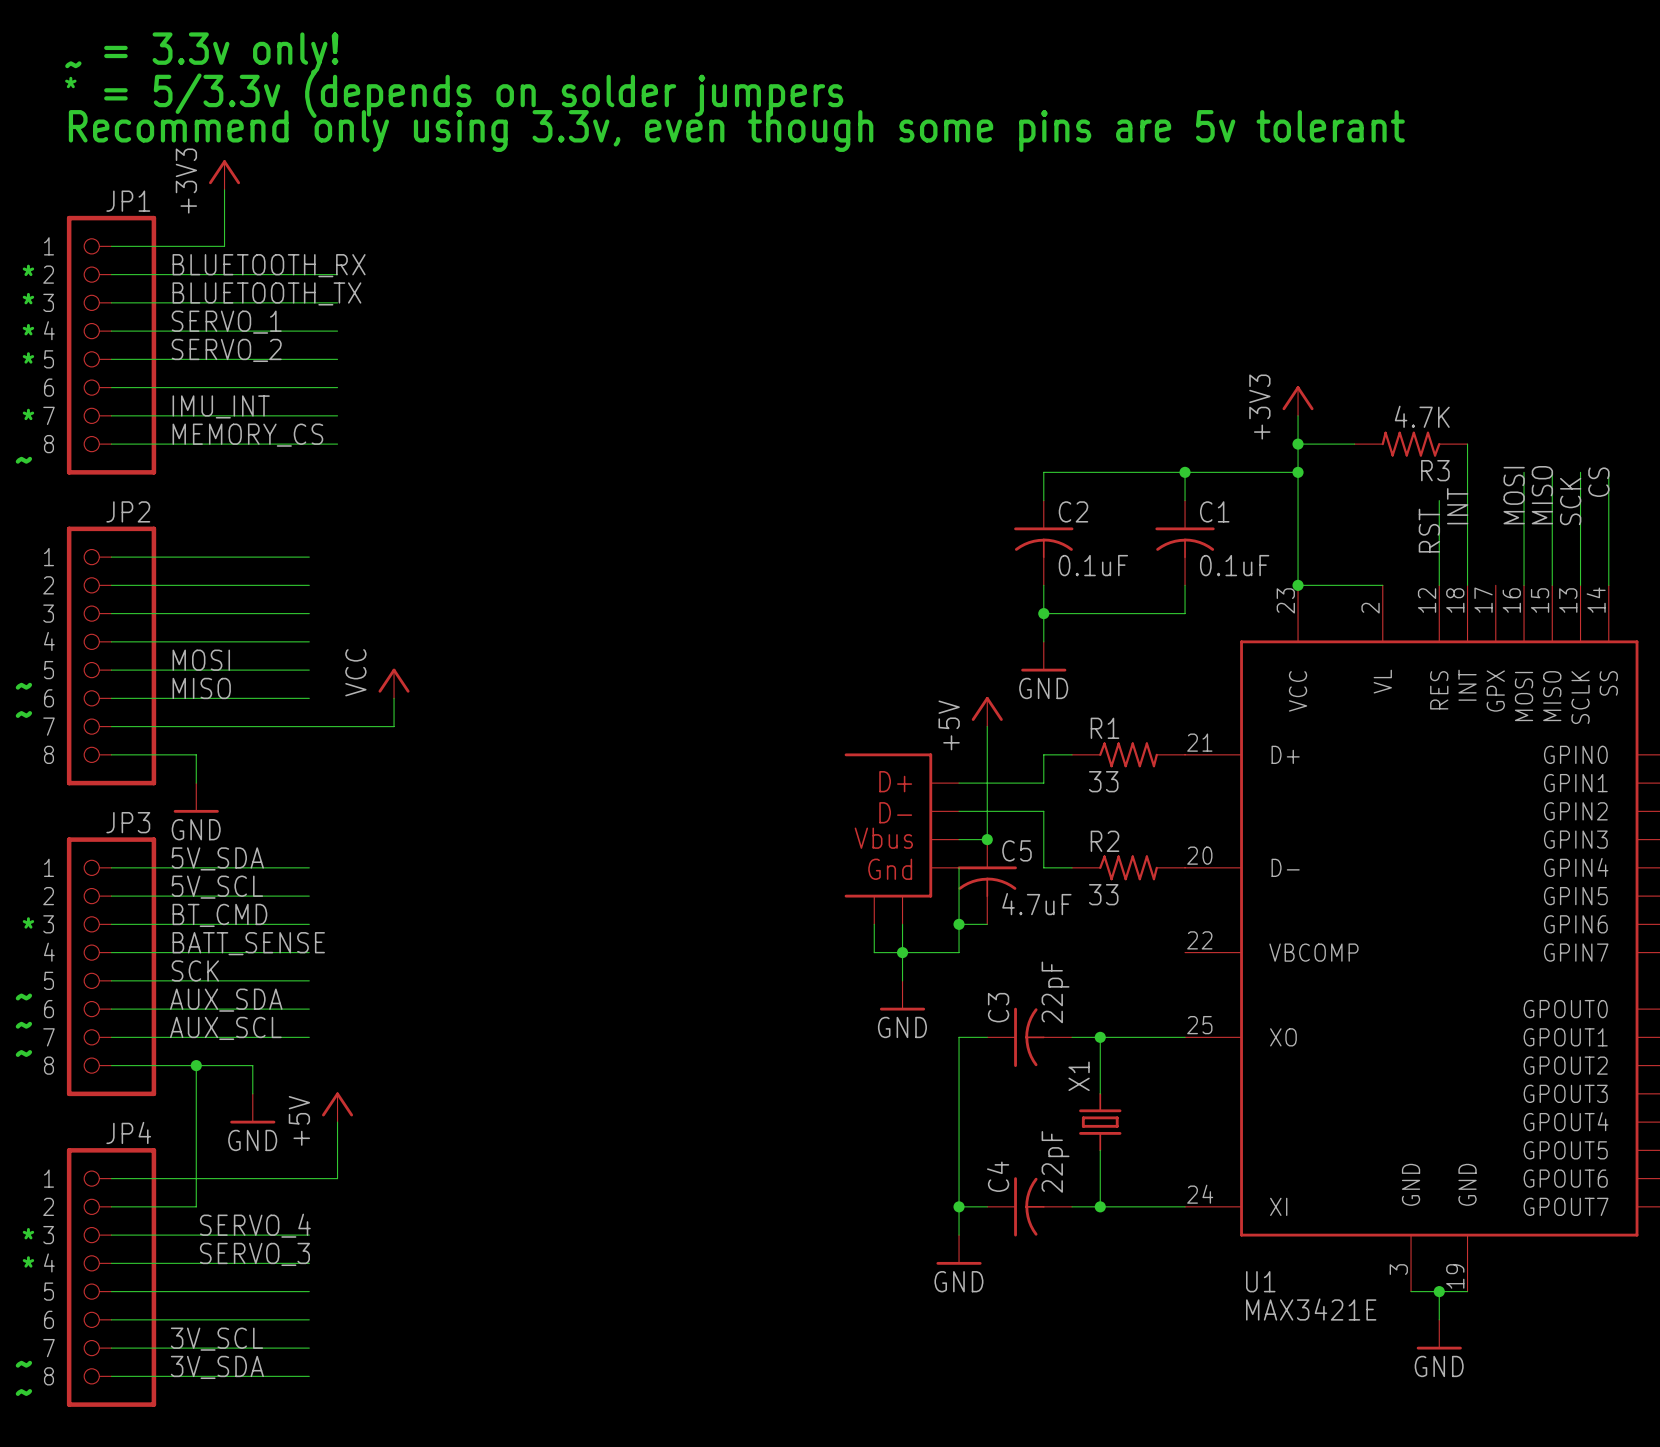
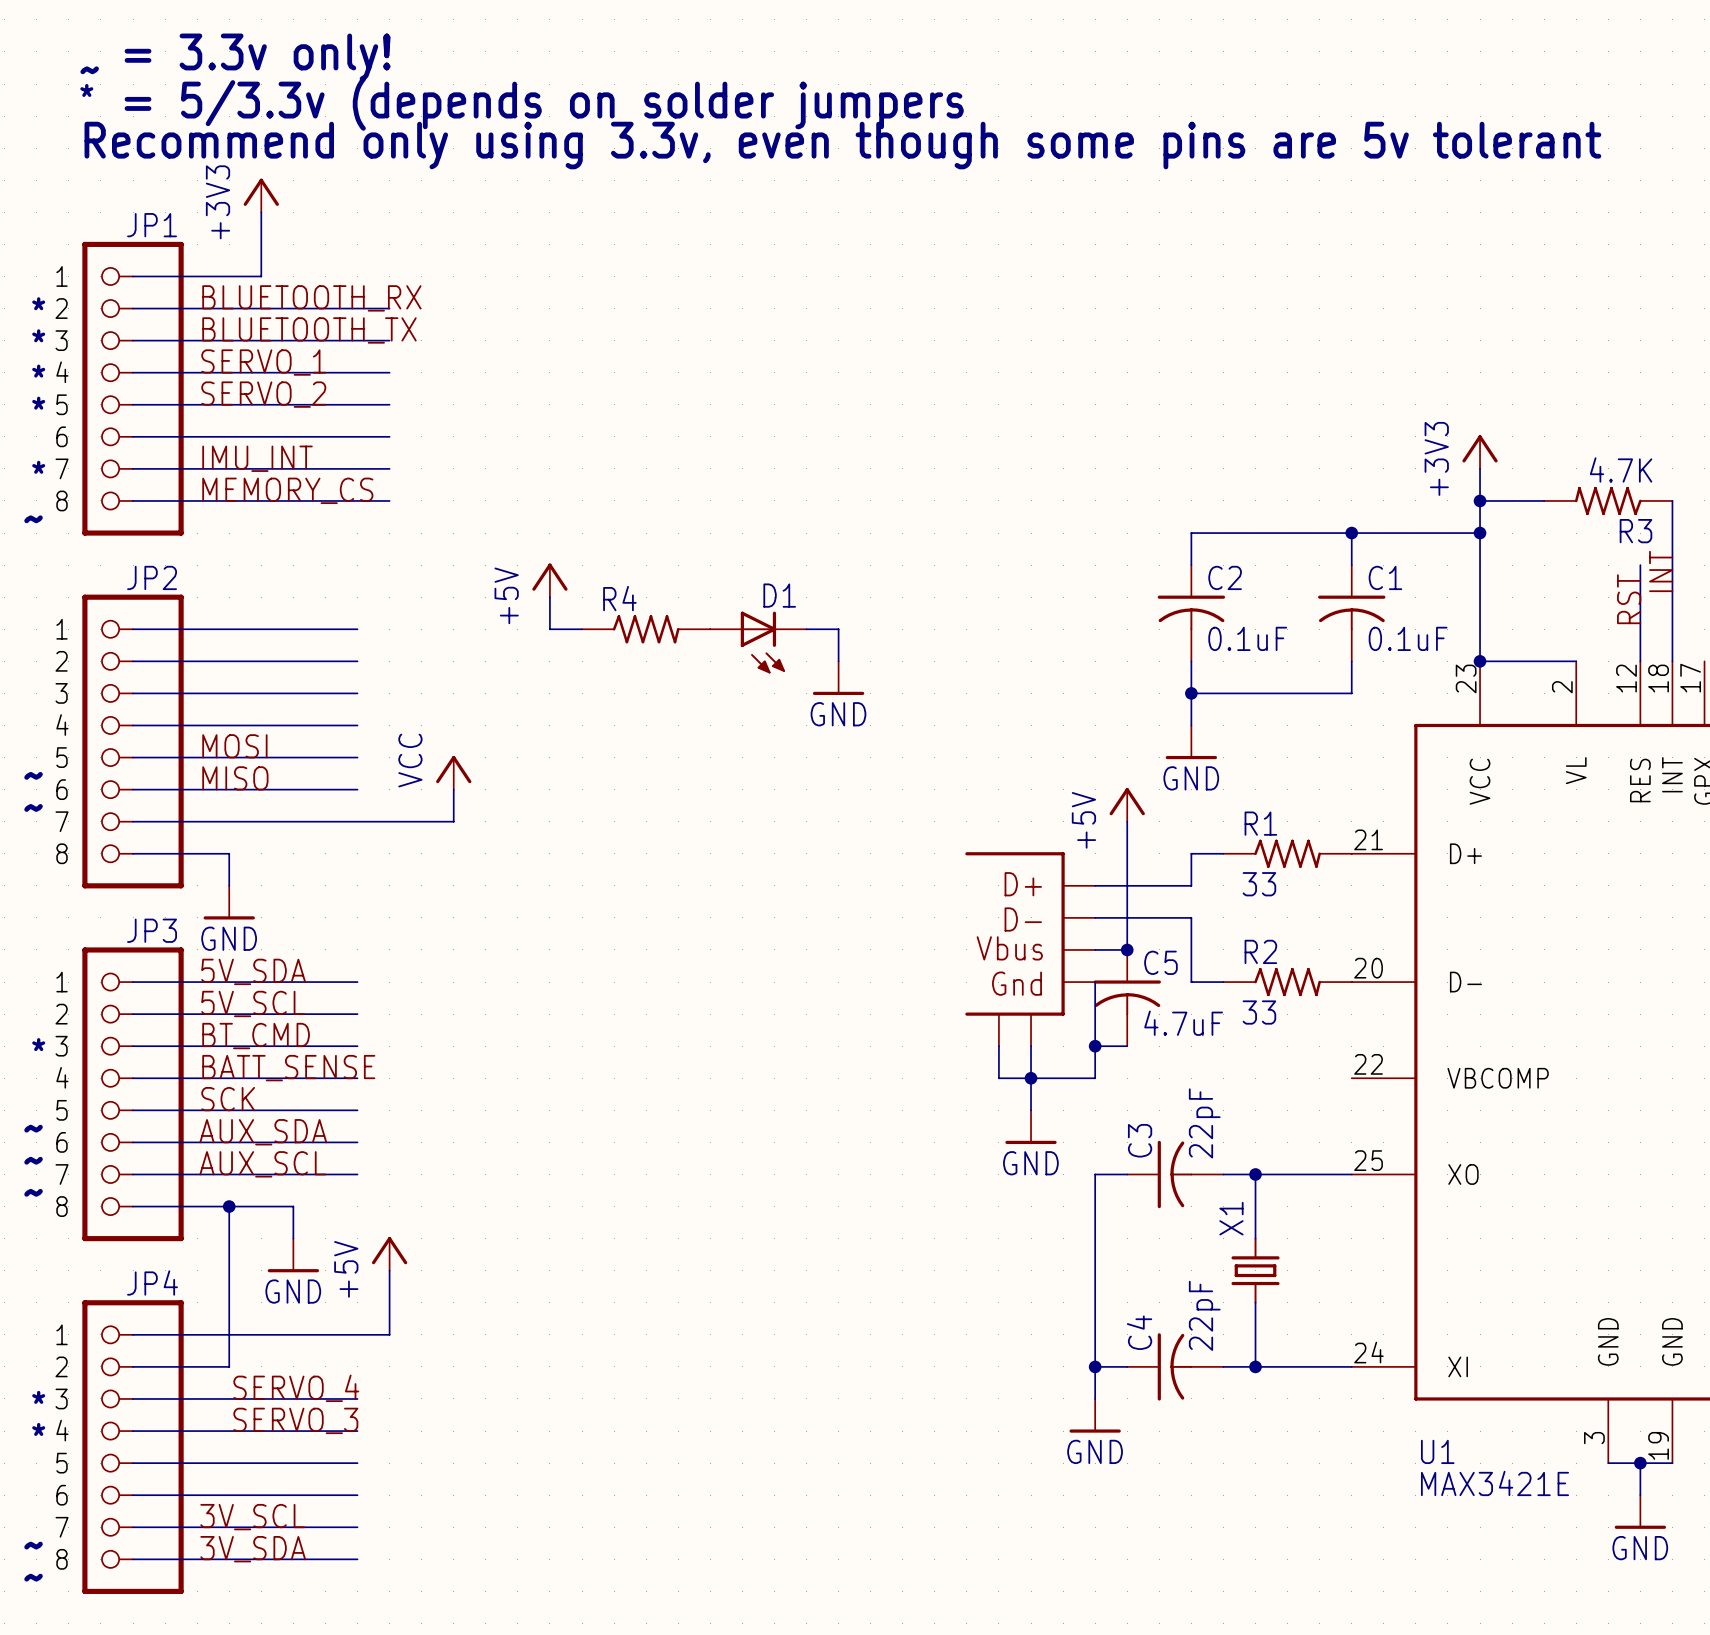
power symbol: none -> +5V (549, 580)
wire: none -> (549, 597) (549, 629) (582, 629)
R4: none -> (646, 629)
wire: none -> (806, 629) (838, 629) (838, 661)
D1: none -> (758, 642)
power symbol: none -> GND (838, 678)

